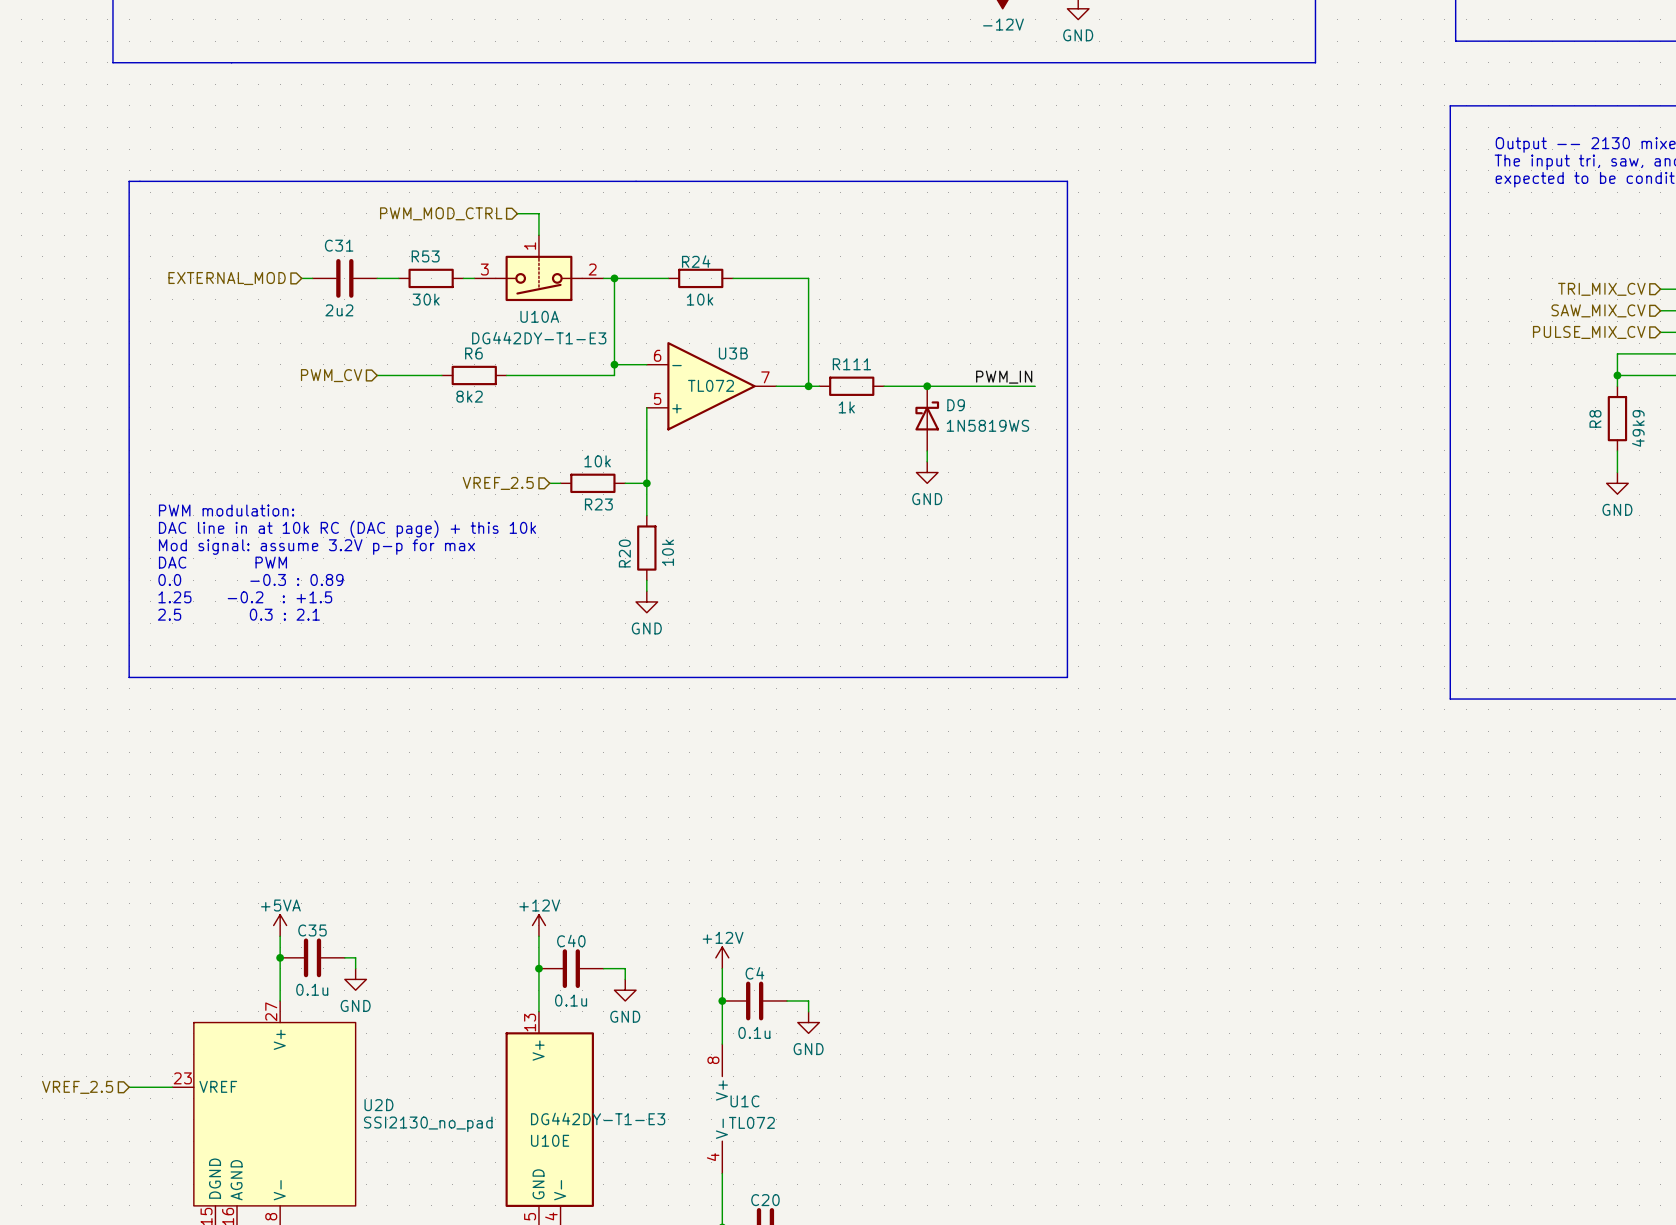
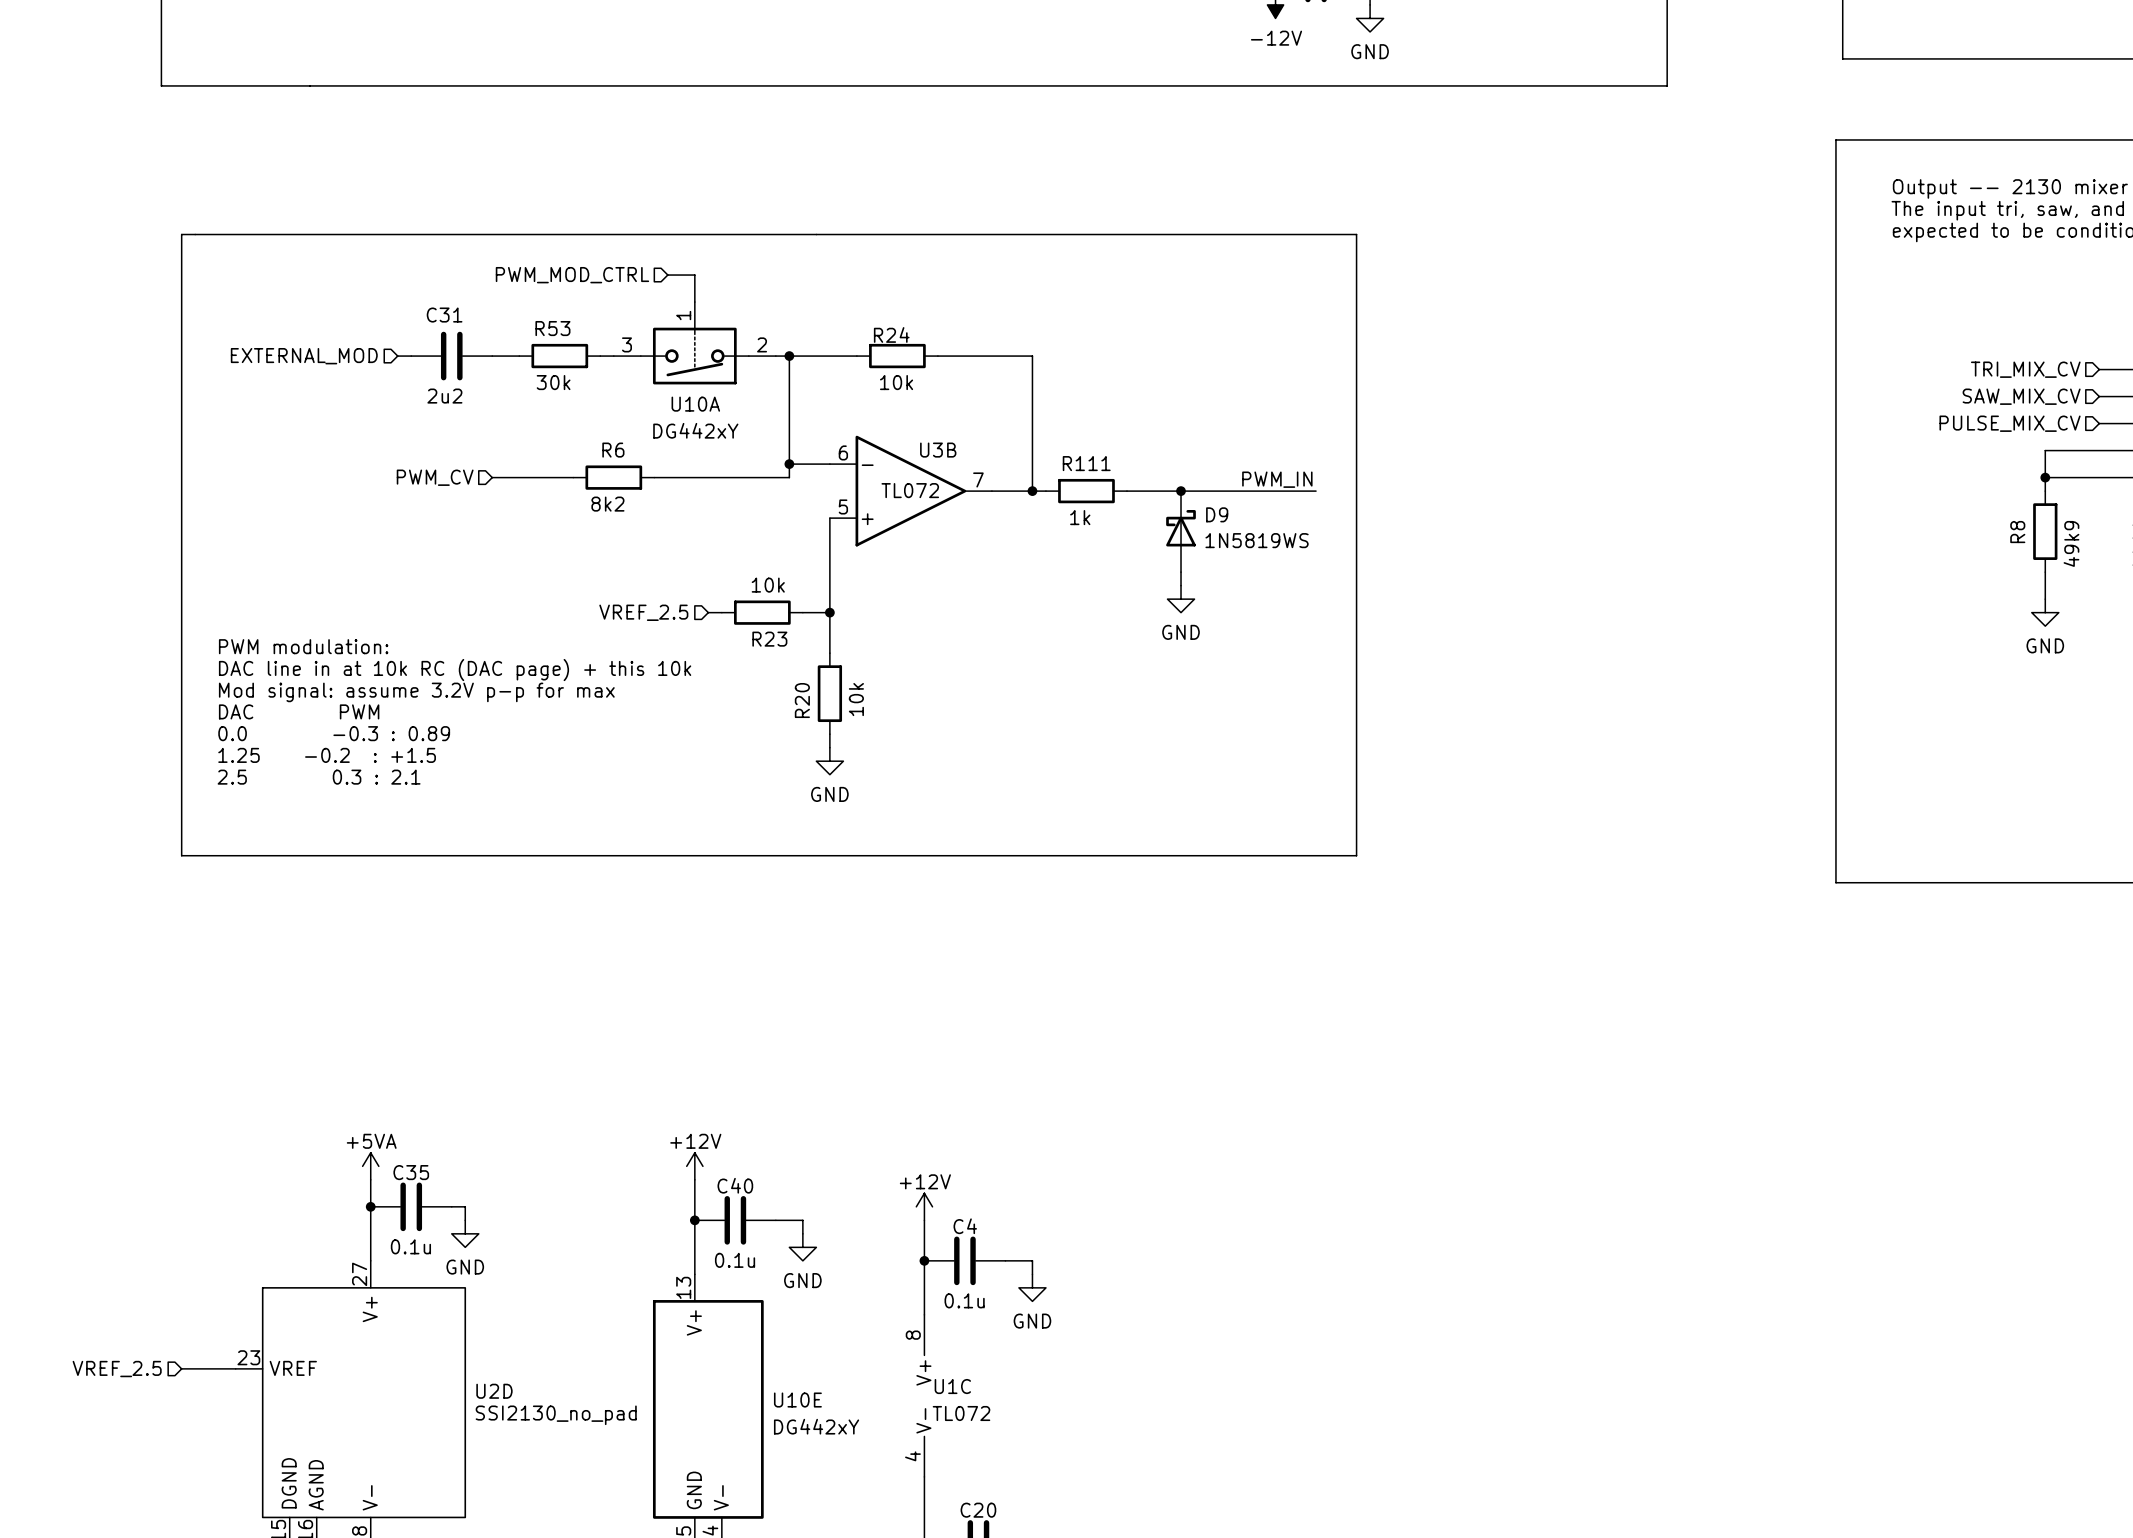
U10A value: DG442DY-T1-E3 (539, 338) -> DG442xY (695, 430)
U10E value: DG442DY-T1-E3 (598, 1118) -> DG442xY (816, 1426)
U10E name position: U10E (550, 1140) -> U10E (797, 1400)

